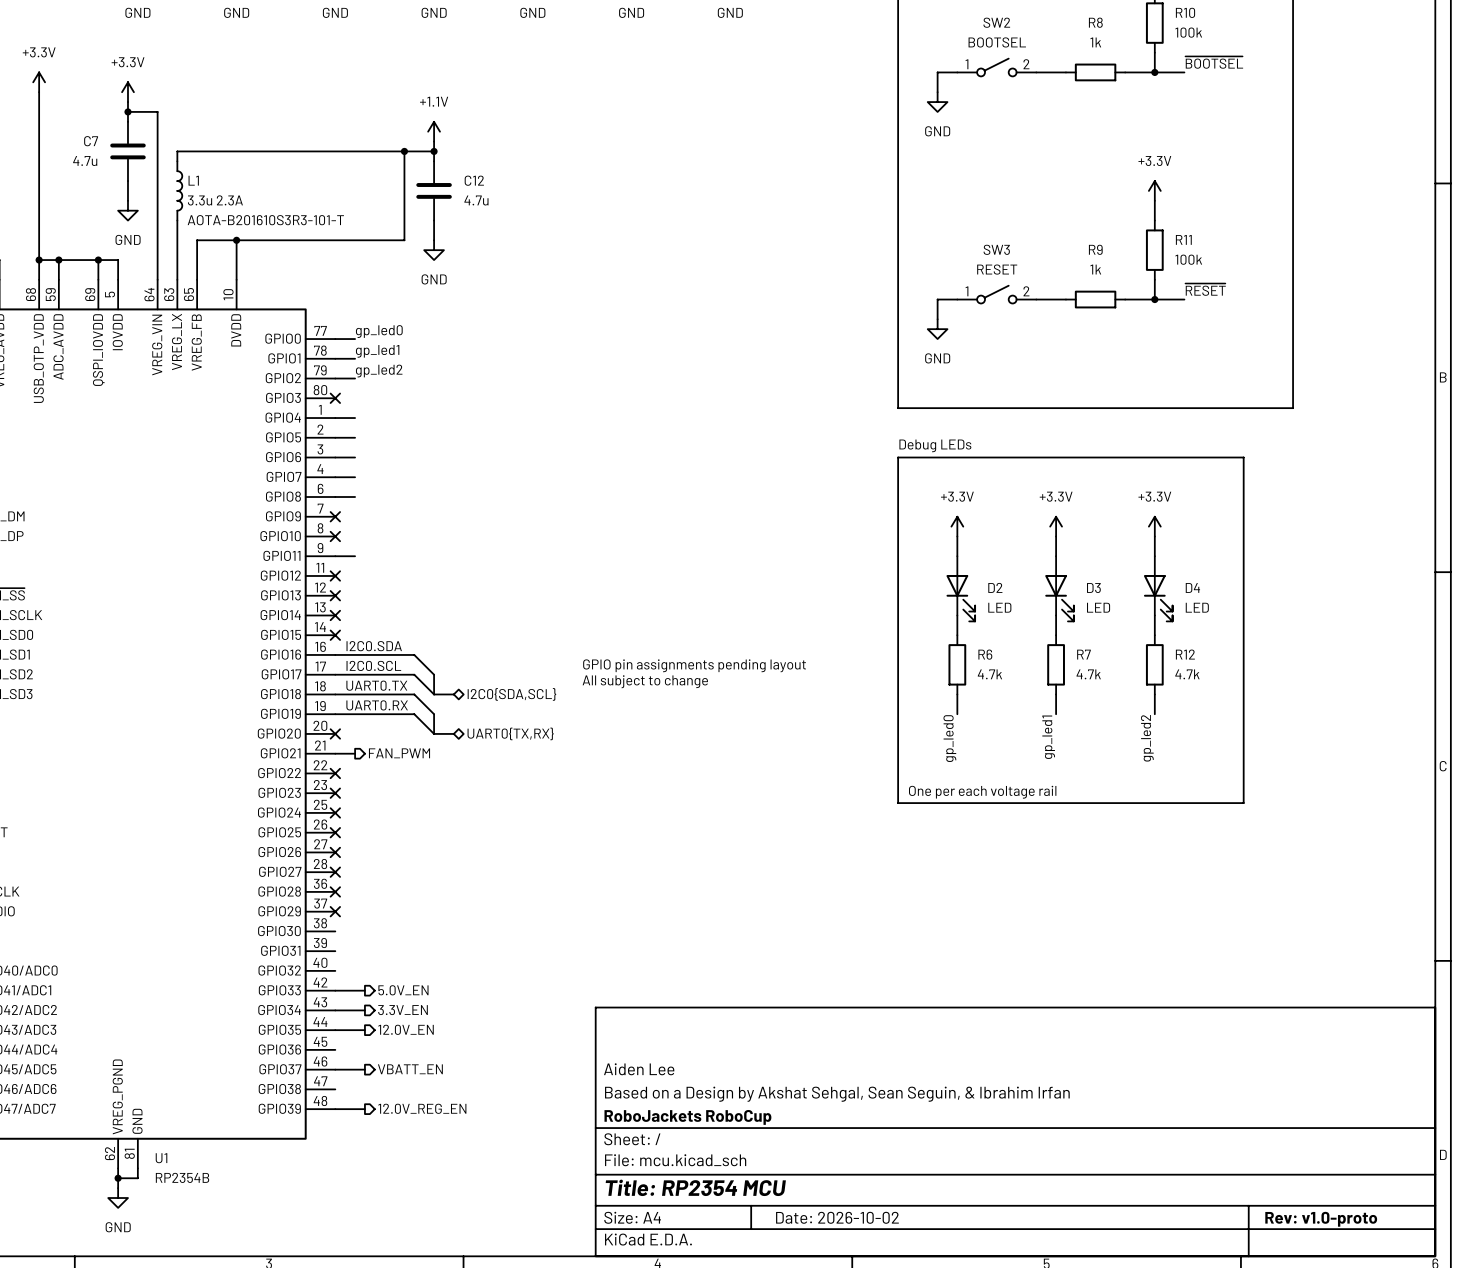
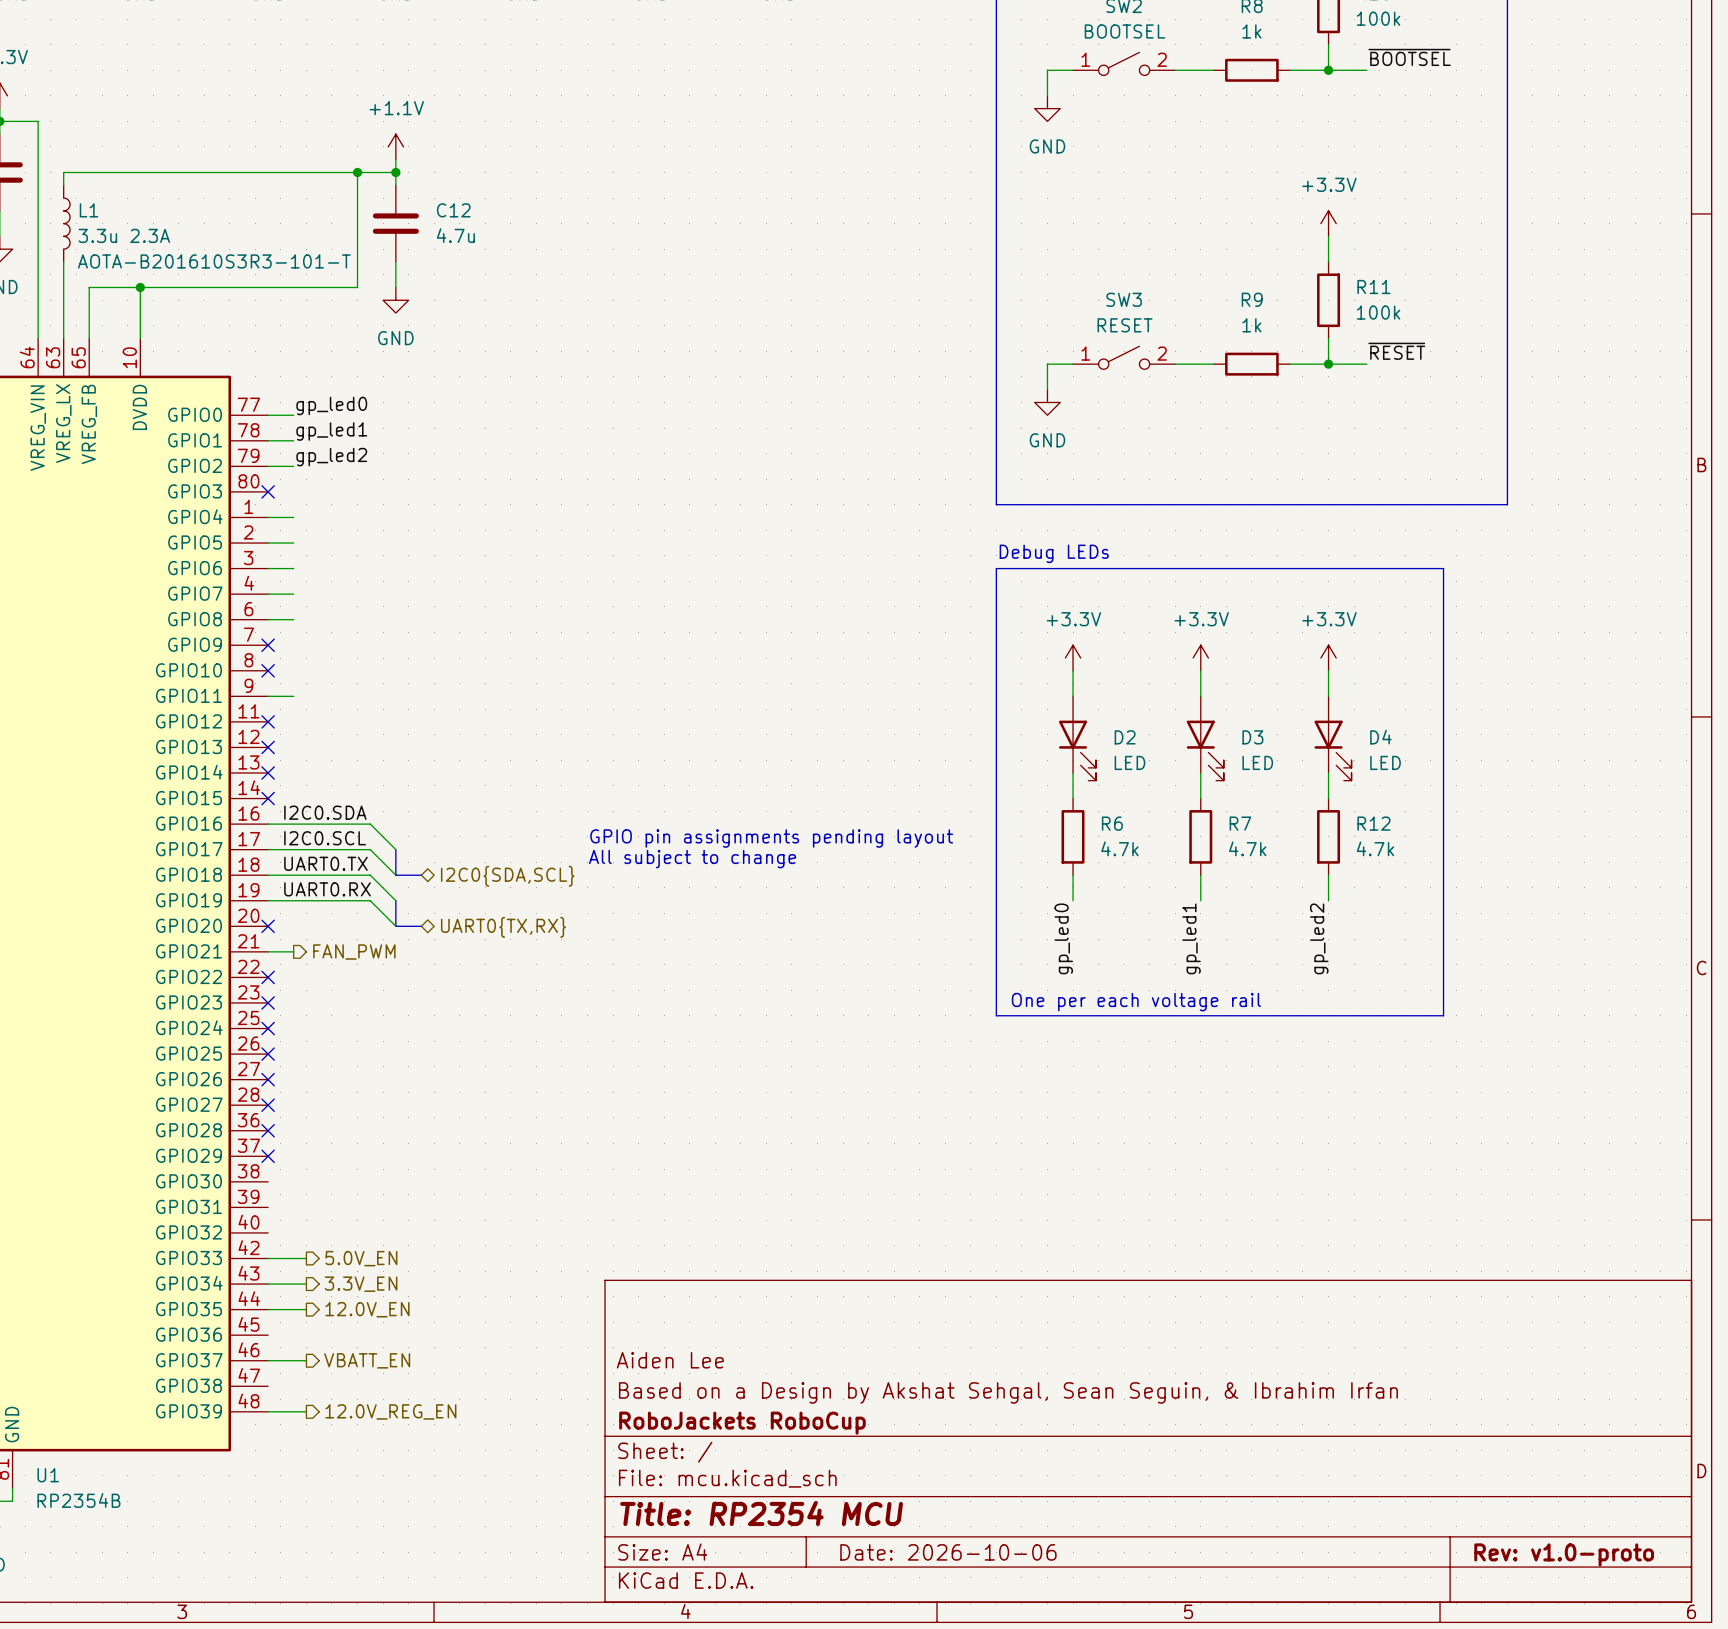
title block: Date: 2026-10-02 (837, 1217) -> Date: 2026-10-06 (948, 1552)

